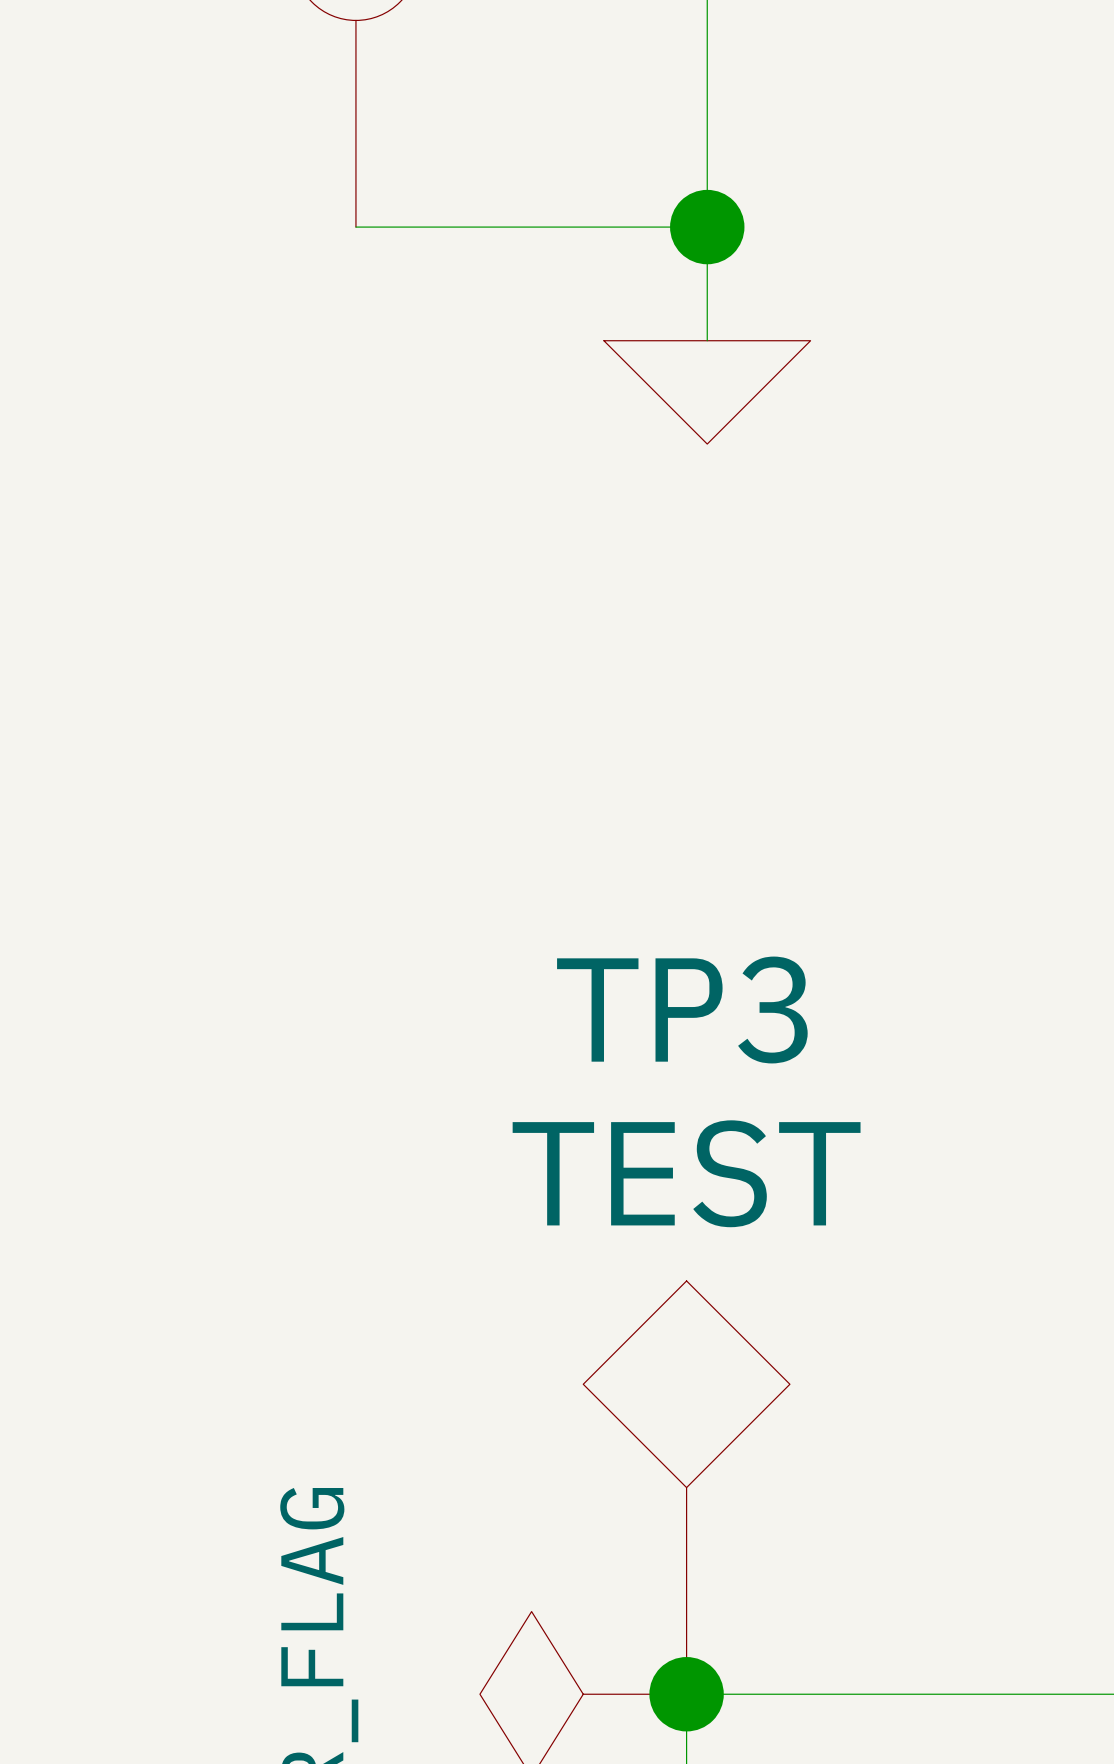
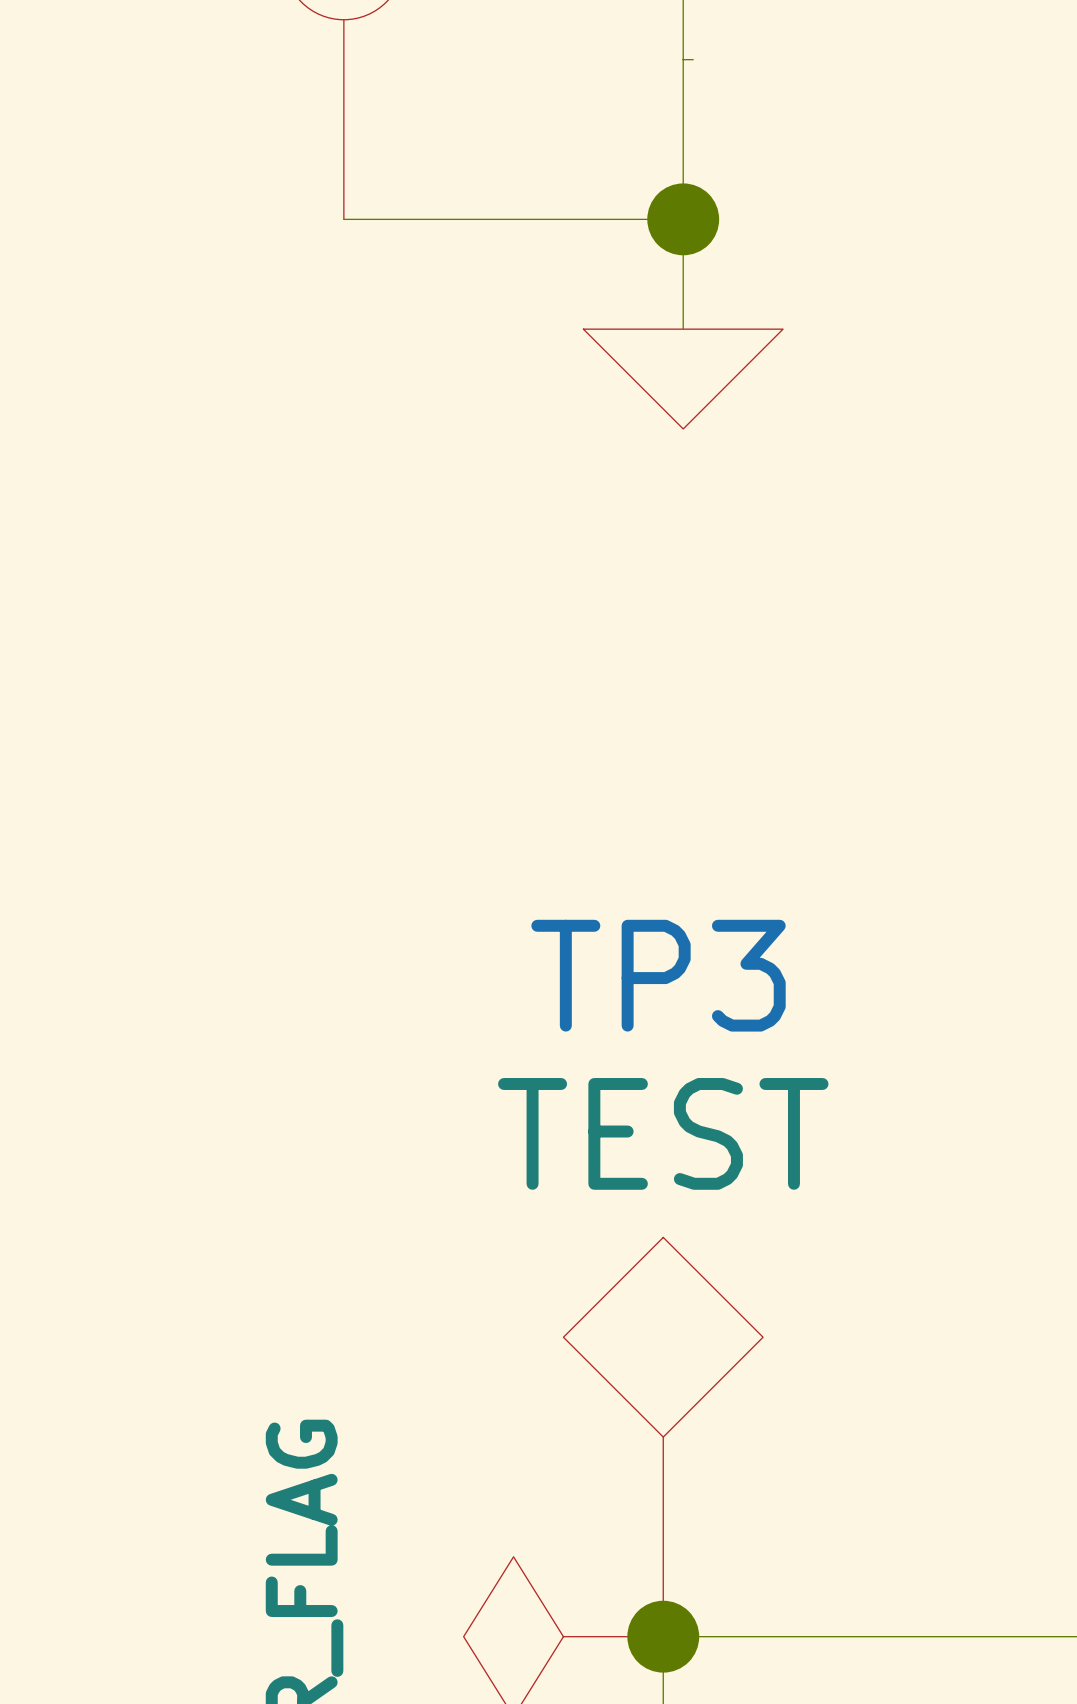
wire: none -> (683, 59) (693, 59)

